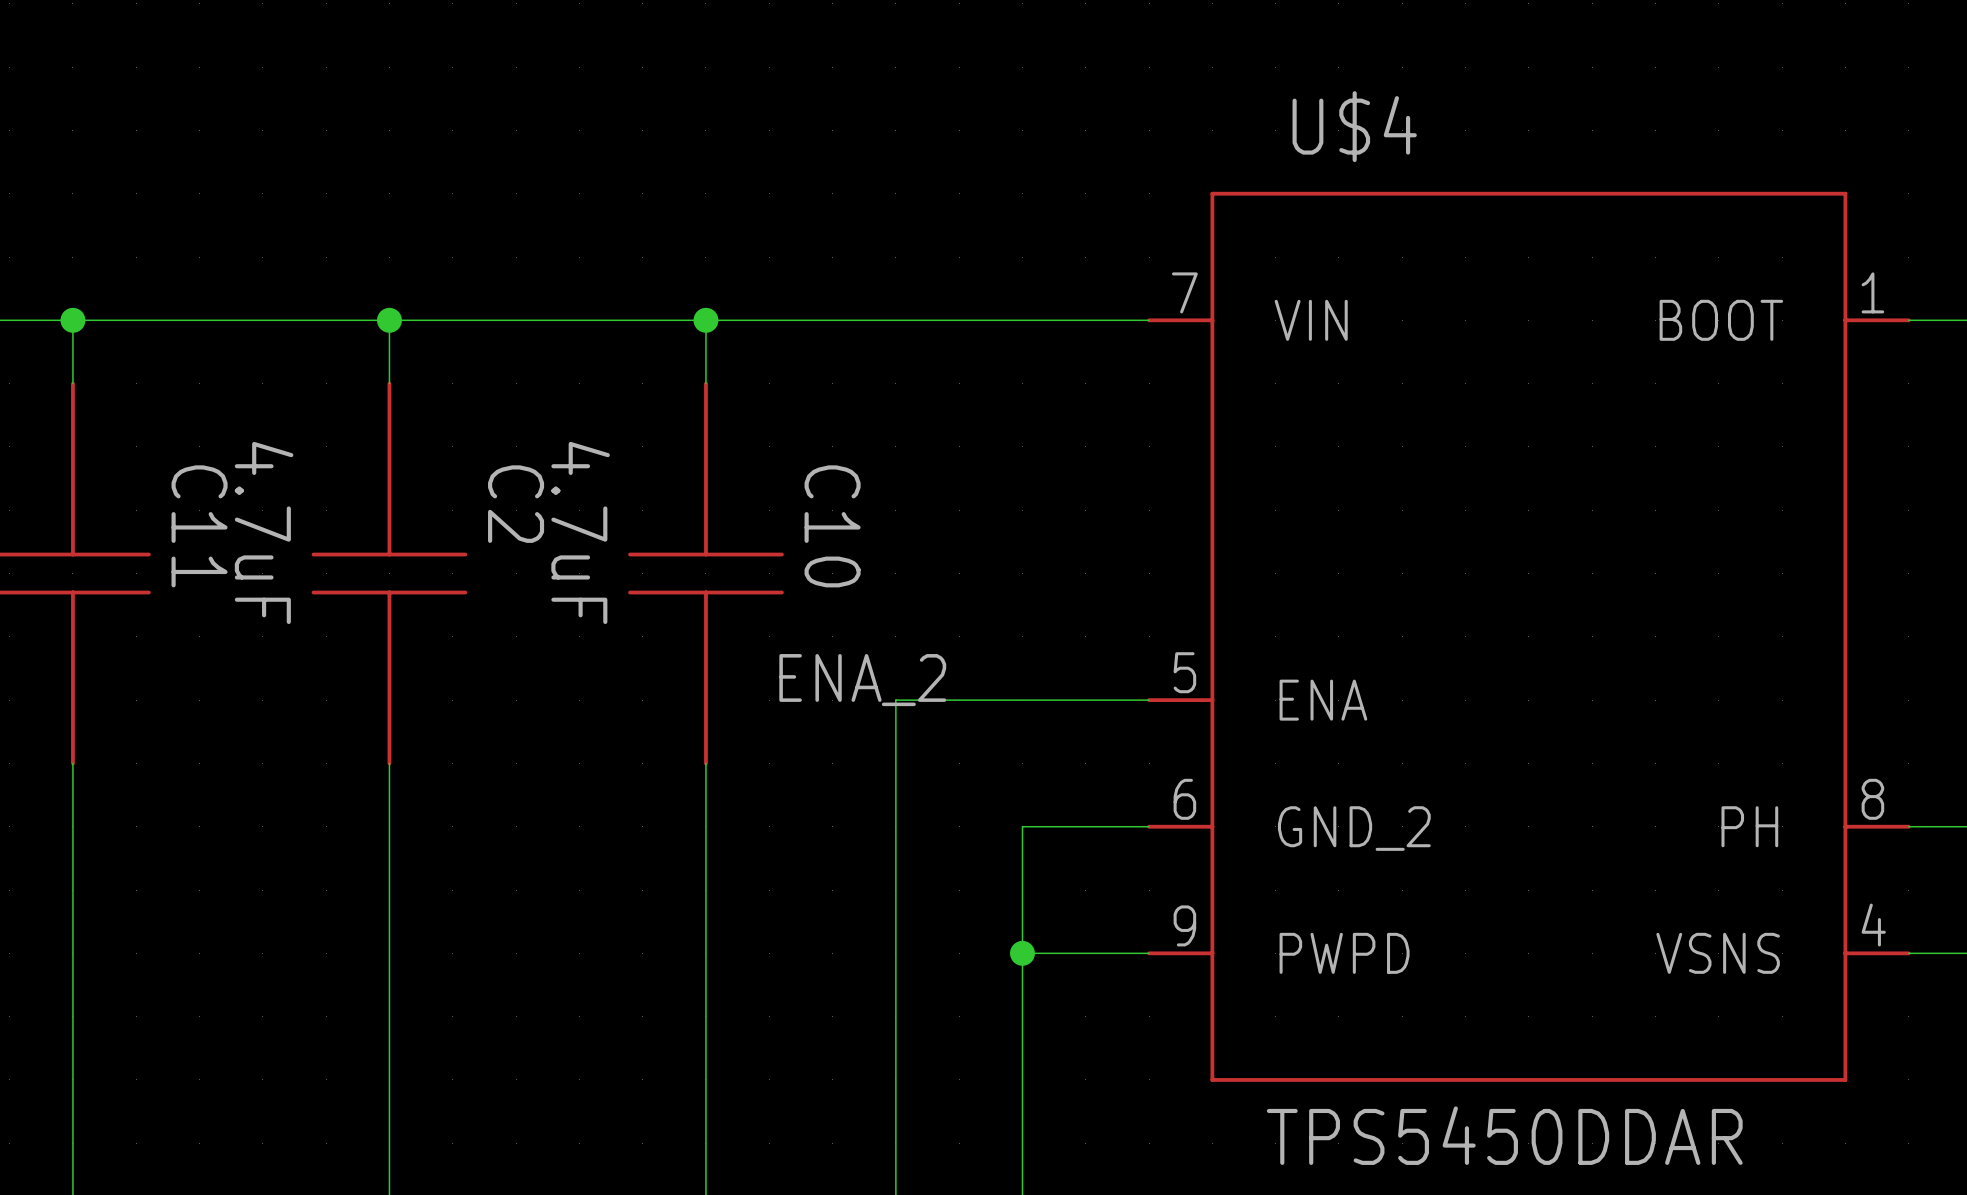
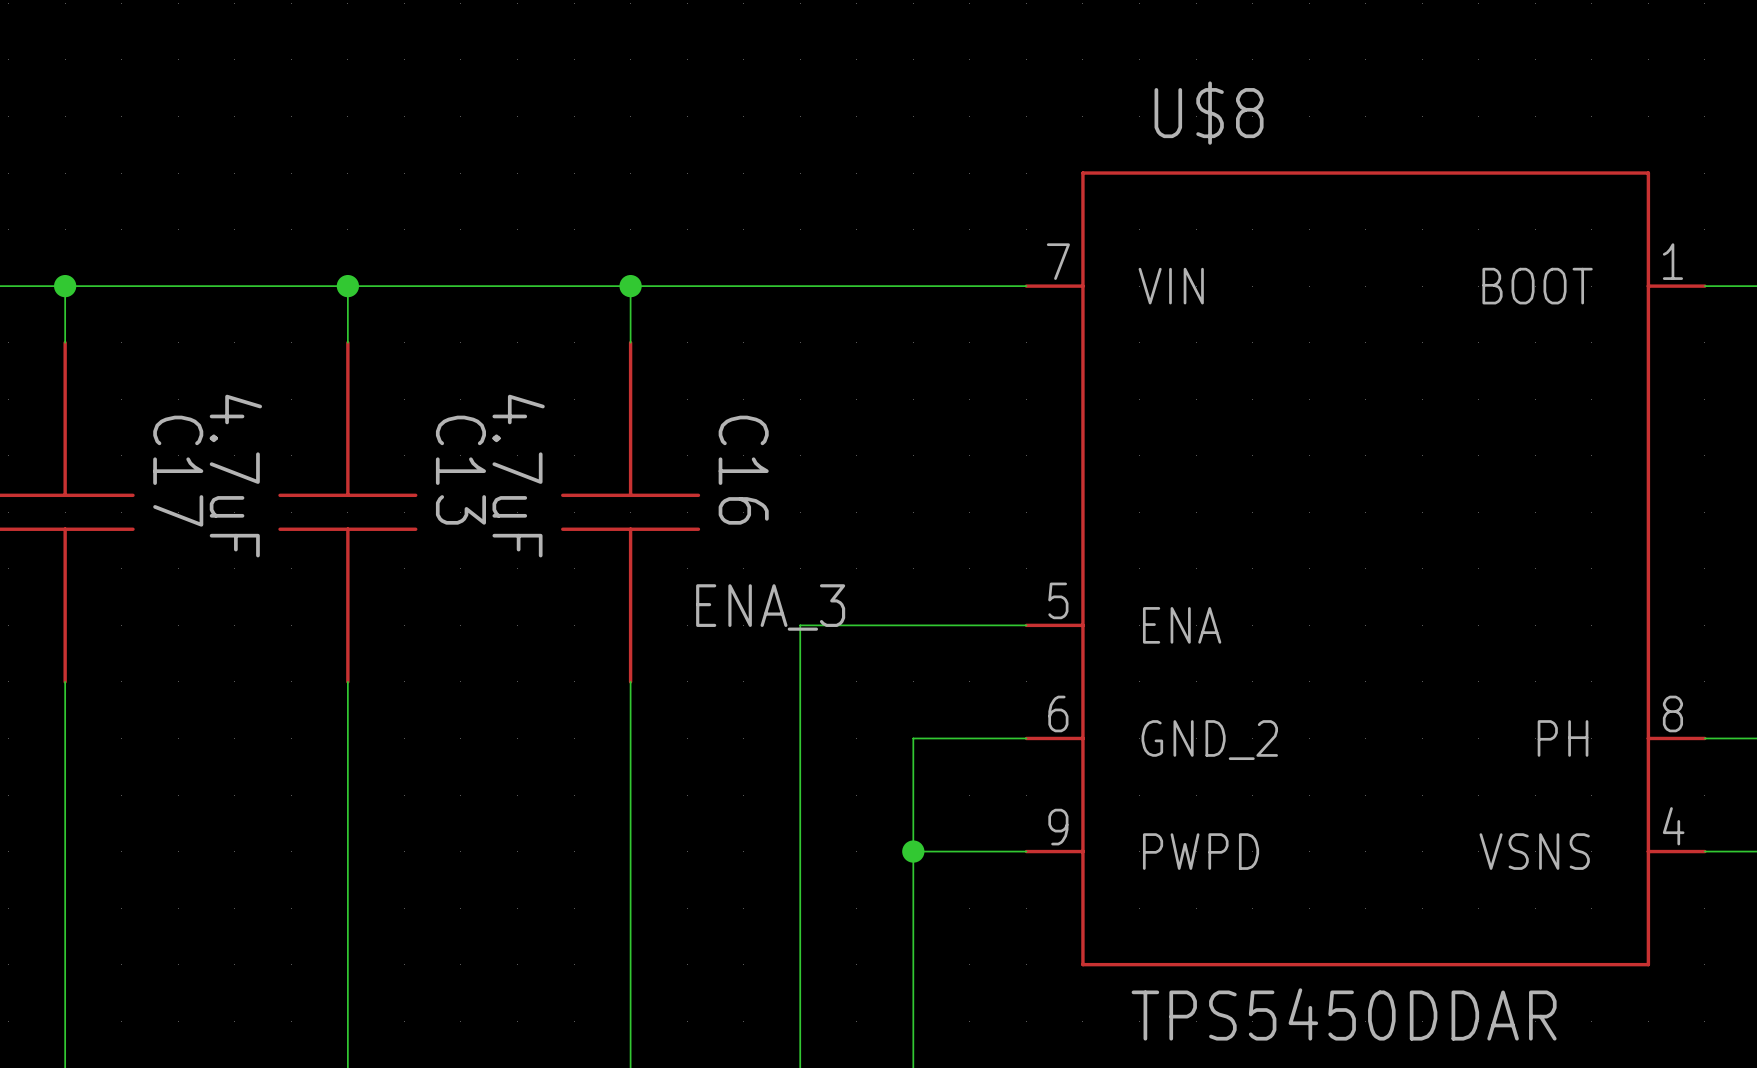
U$4 name: U$4 (1354, 126) -> U$8 (1209, 113)
C2 name: C2 (516, 504) -> C13 (460, 470)
C11 name: C11 (199, 526) -> C17 (178, 471)
C10 name: C10 (832, 526) -> C16 (743, 470)
label: ENA_2 (862, 680) -> ENA_3 (770, 607)

